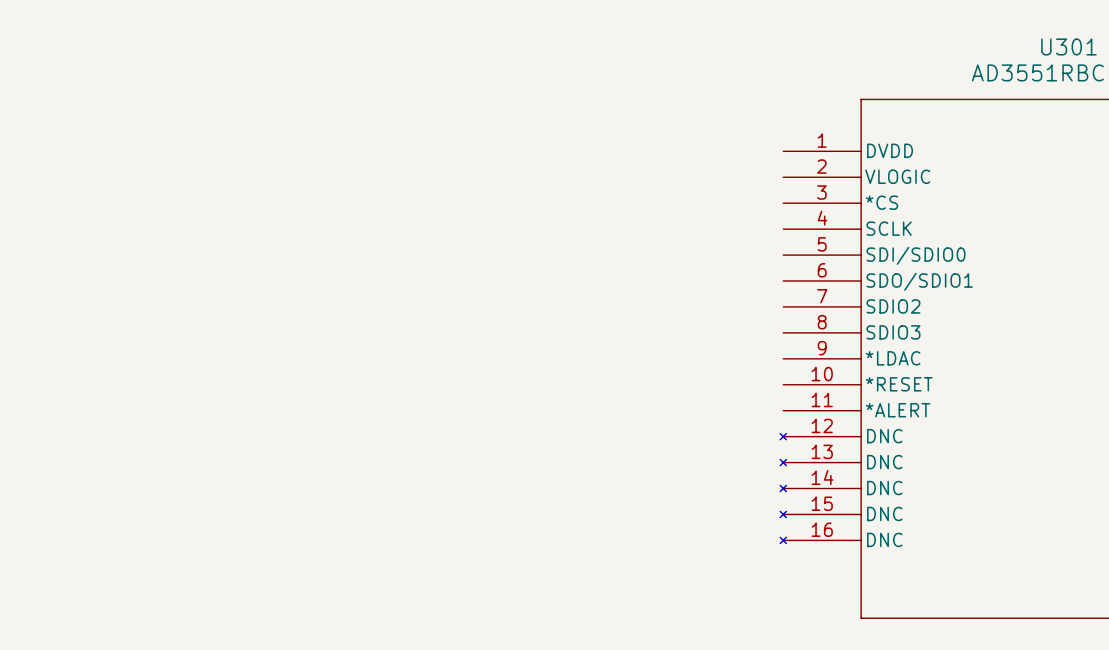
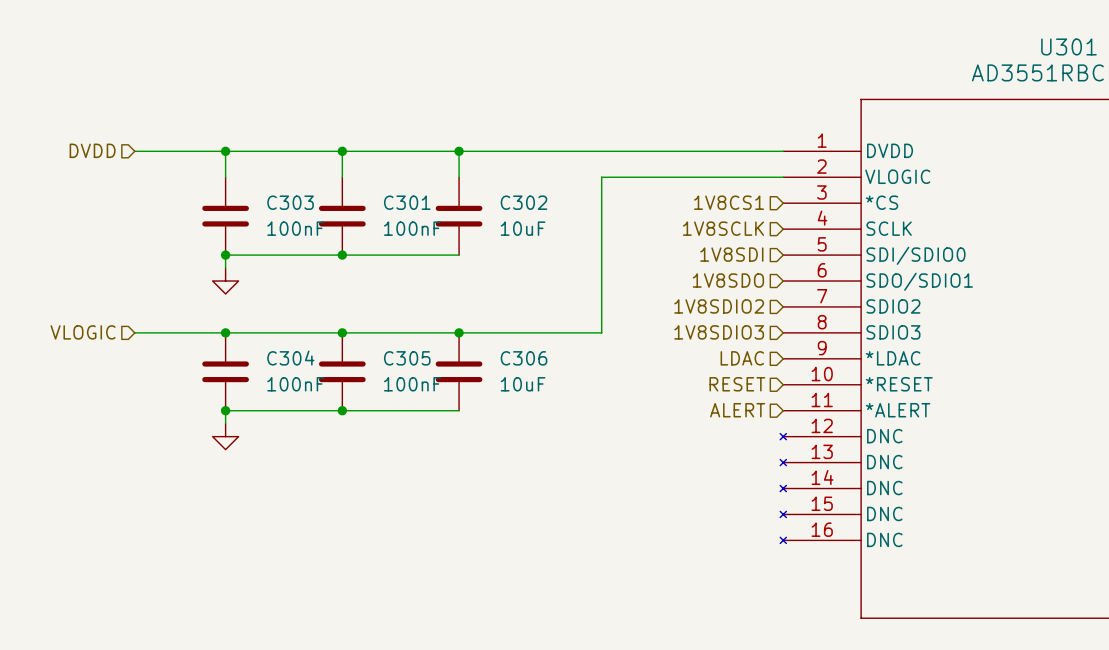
hierarchical label: none -> DVDD (92, 150)
wire: none -> (134, 151) (783, 151)
wire: none -> (225, 151) (225, 177)
junction: none -> (225, 151)
wire: none -> (342, 151) (342, 177)
junction: none -> (342, 151)
wire: none -> (459, 151) (459, 177)
junction: none -> (459, 151)
wire: none -> (783, 177) (601, 177) (601, 332) (134, 332)
hierarchical label: none -> 1V8CS1 (729, 202)
C303: none -> 100nF (225, 216)
C301: none -> 100nF (342, 216)
C302: none -> 10uF (459, 216)
hierarchical label: none -> 1V8SCLK (723, 228)
hierarchical label: none -> 1V8SDI (731, 254)
junction: none -> (225, 255)
junction: none -> (342, 255)
wire: none -> (459, 255) (225, 255) (225, 268)
hierarchical label: none -> 1V8SDO (728, 280)
power symbol: none -> (225, 281)
hierarchical label: none -> 1V8SDIO2 (719, 306)
hierarchical label: none -> VLOGIC (83, 332)
junction: none -> (225, 332)
junction: none -> (342, 332)
junction: none -> (459, 332)
hierarchical label: none -> 1V8SDIO3 (719, 332)
hierarchical label: none -> LDAC (742, 358)
C304: none -> 100nF (225, 371)
C305: none -> 100nF (342, 371)
C306: none -> 10uF (459, 371)
hierarchical label: none -> RESET (737, 384)
junction: none -> (225, 410)
junction: none -> (342, 410)
wire: none -> (459, 410) (225, 410) (225, 423)
hierarchical label: none -> ALERT (737, 410)
power symbol: none -> (225, 436)

